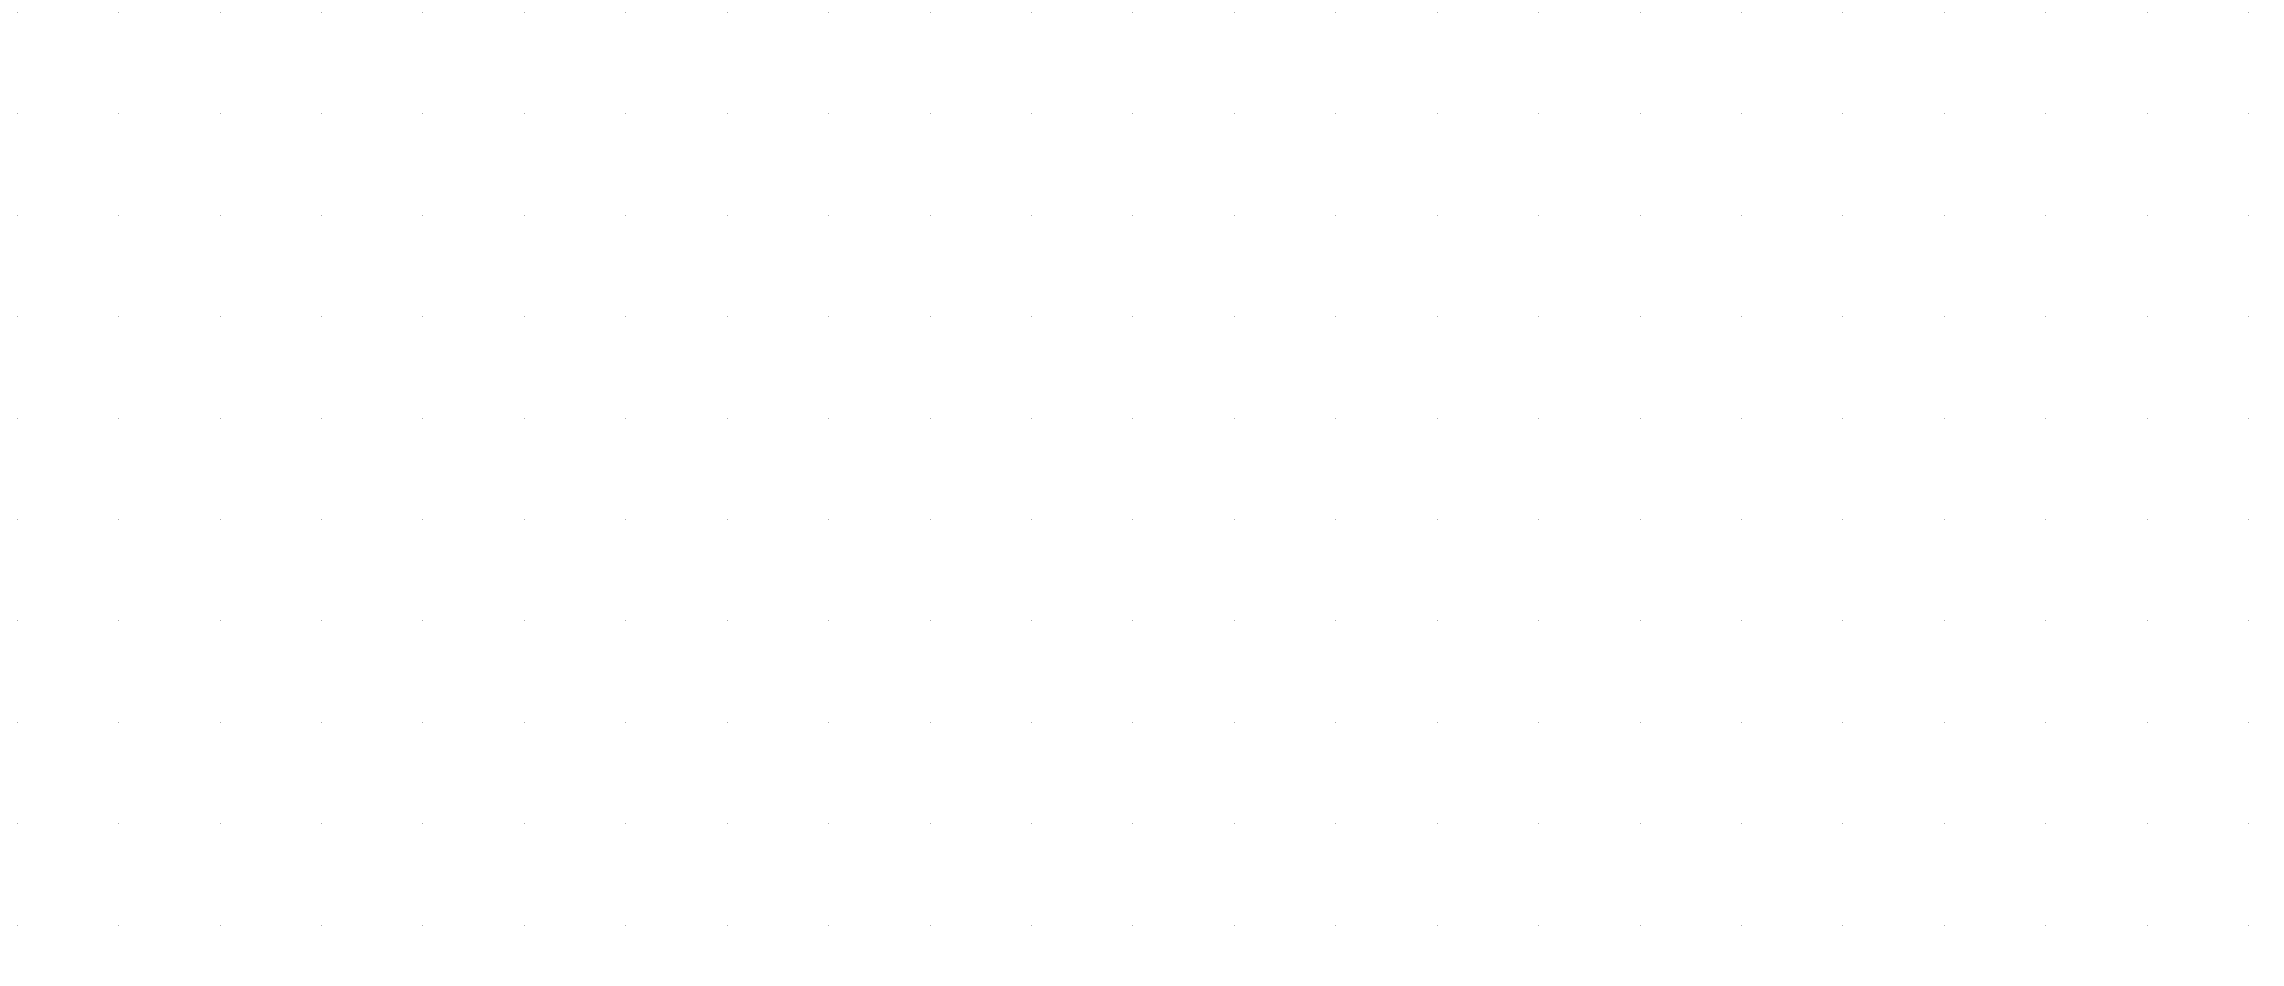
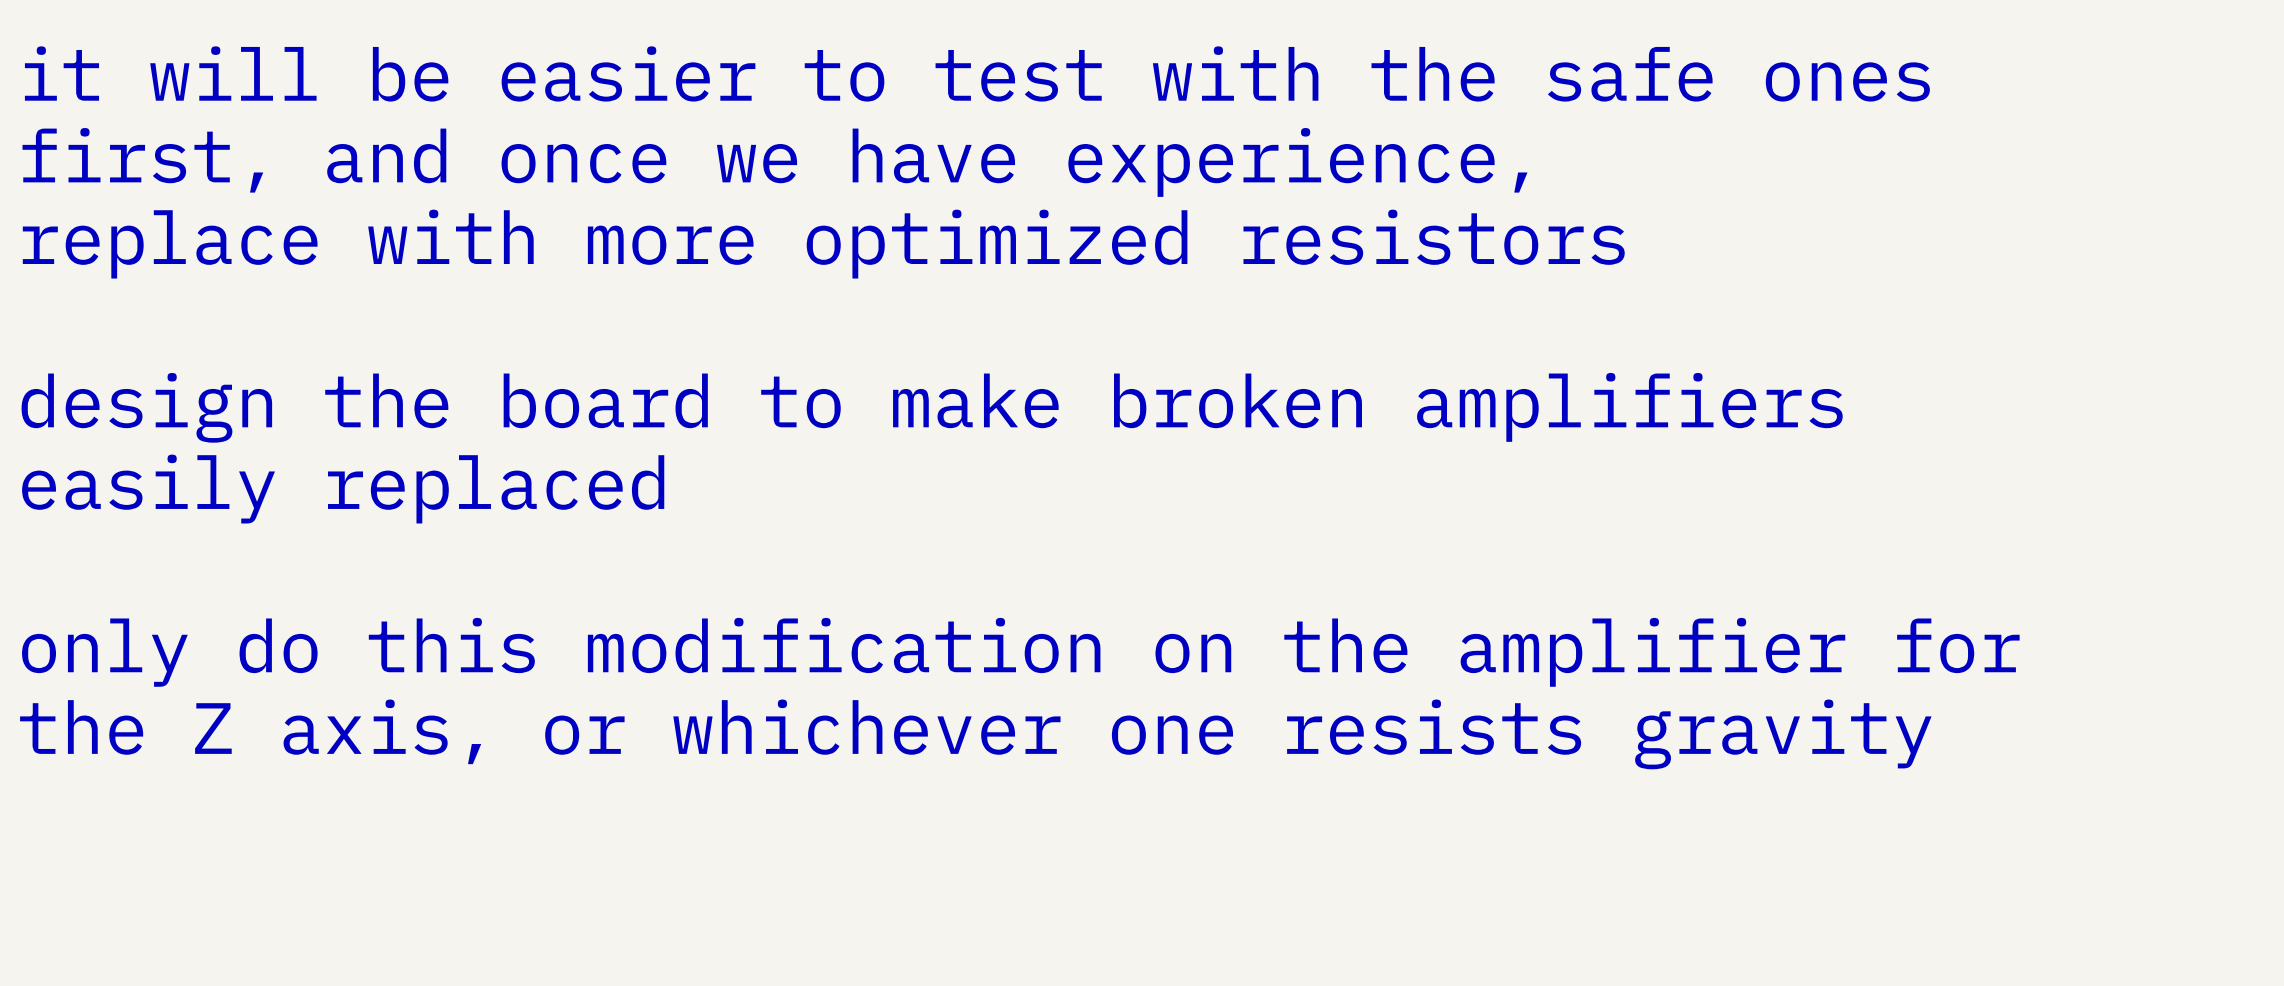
text: none -> it will be easier to test with the safe ones (977, 73)
text: none -> first, and once we have experience, (775, 162)
text: none -> replace with more optimized resistors (823, 244)
text: none -> design the board to make broken amplifiers (932, 407)
text: none -> easily replaced (343, 489)
text: none -> only do this modification on the amplifier for (1020, 652)
text: none -> the Z axis, or whichever one resists gravity (975, 734)

